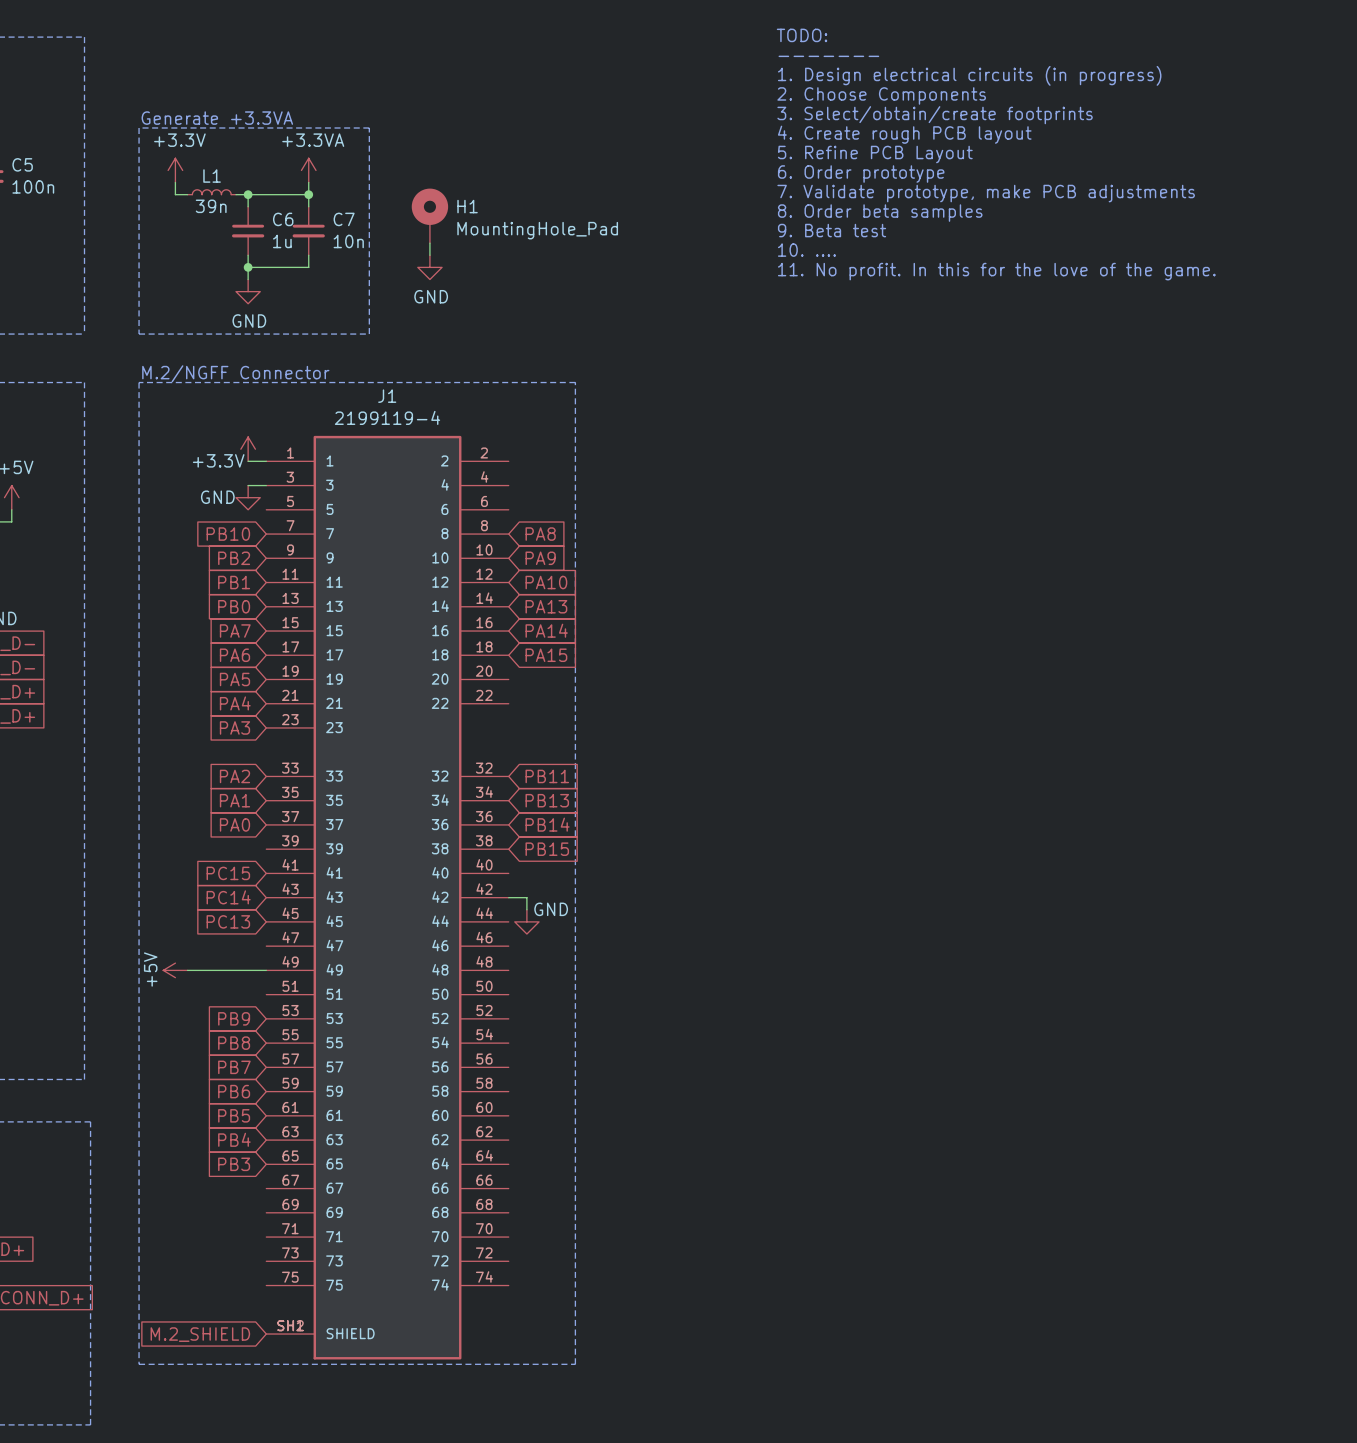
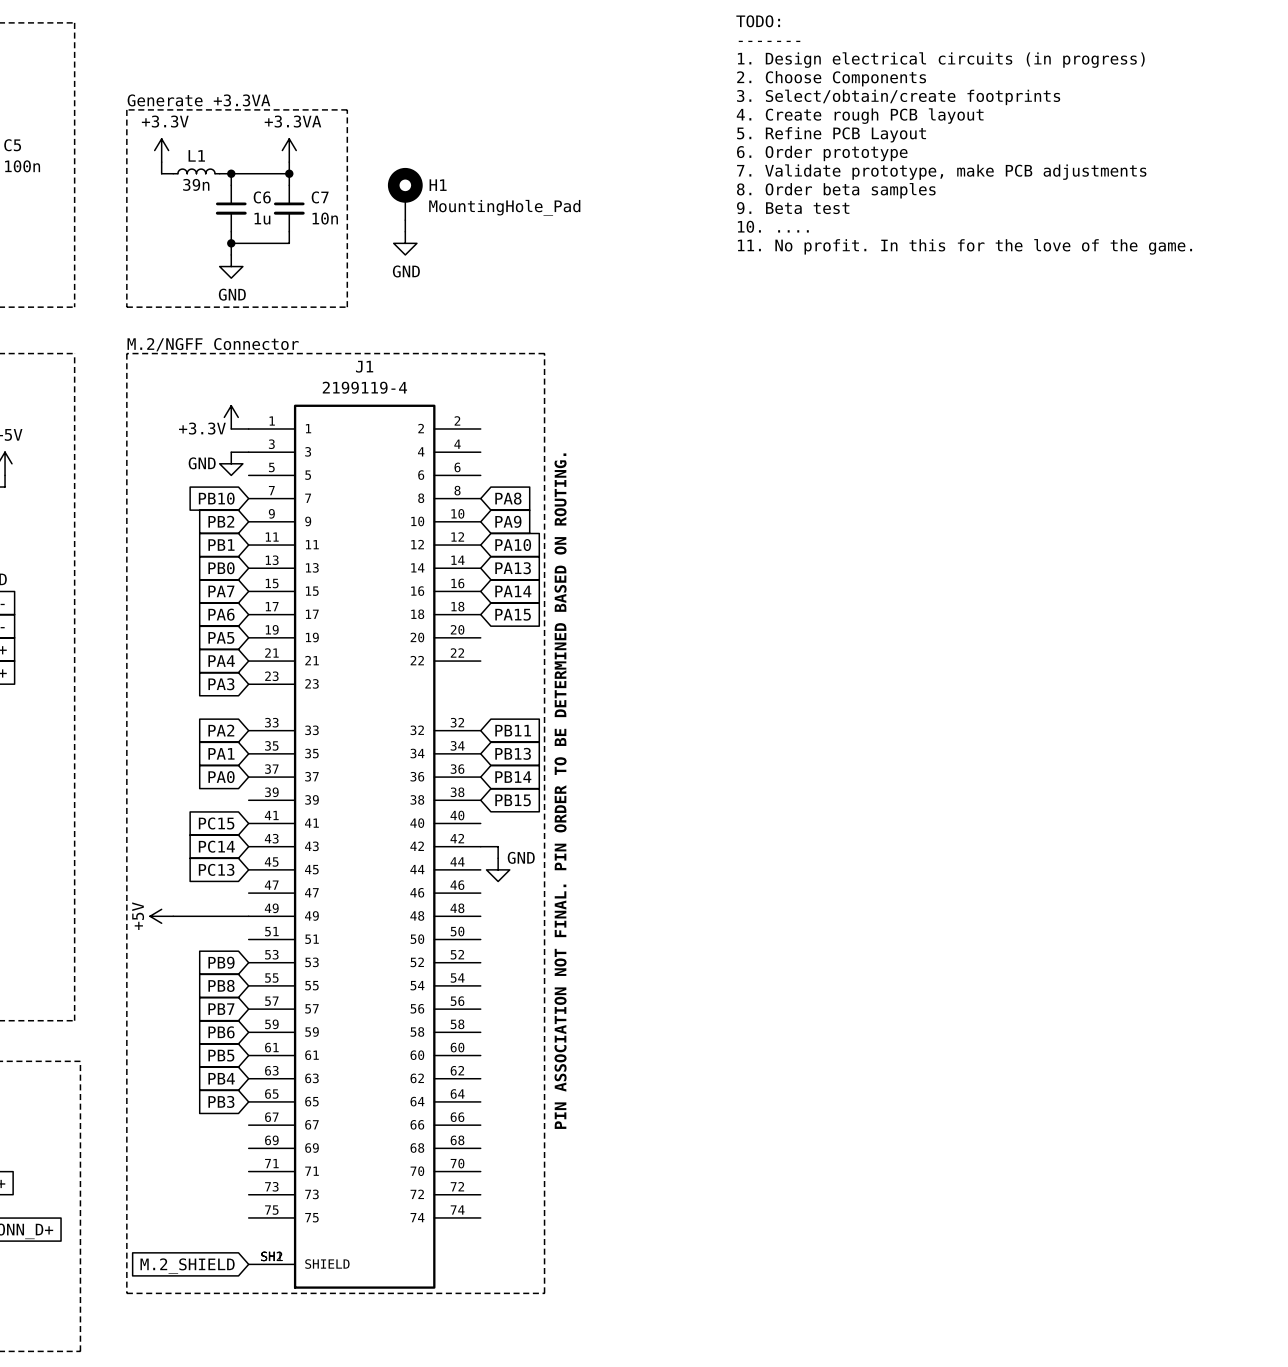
text: none -> PIN ASSOCIATION NOT FINAL. PIN ORDER TO BE DETERMINED BASED ON ROUTING. (560, 791)

